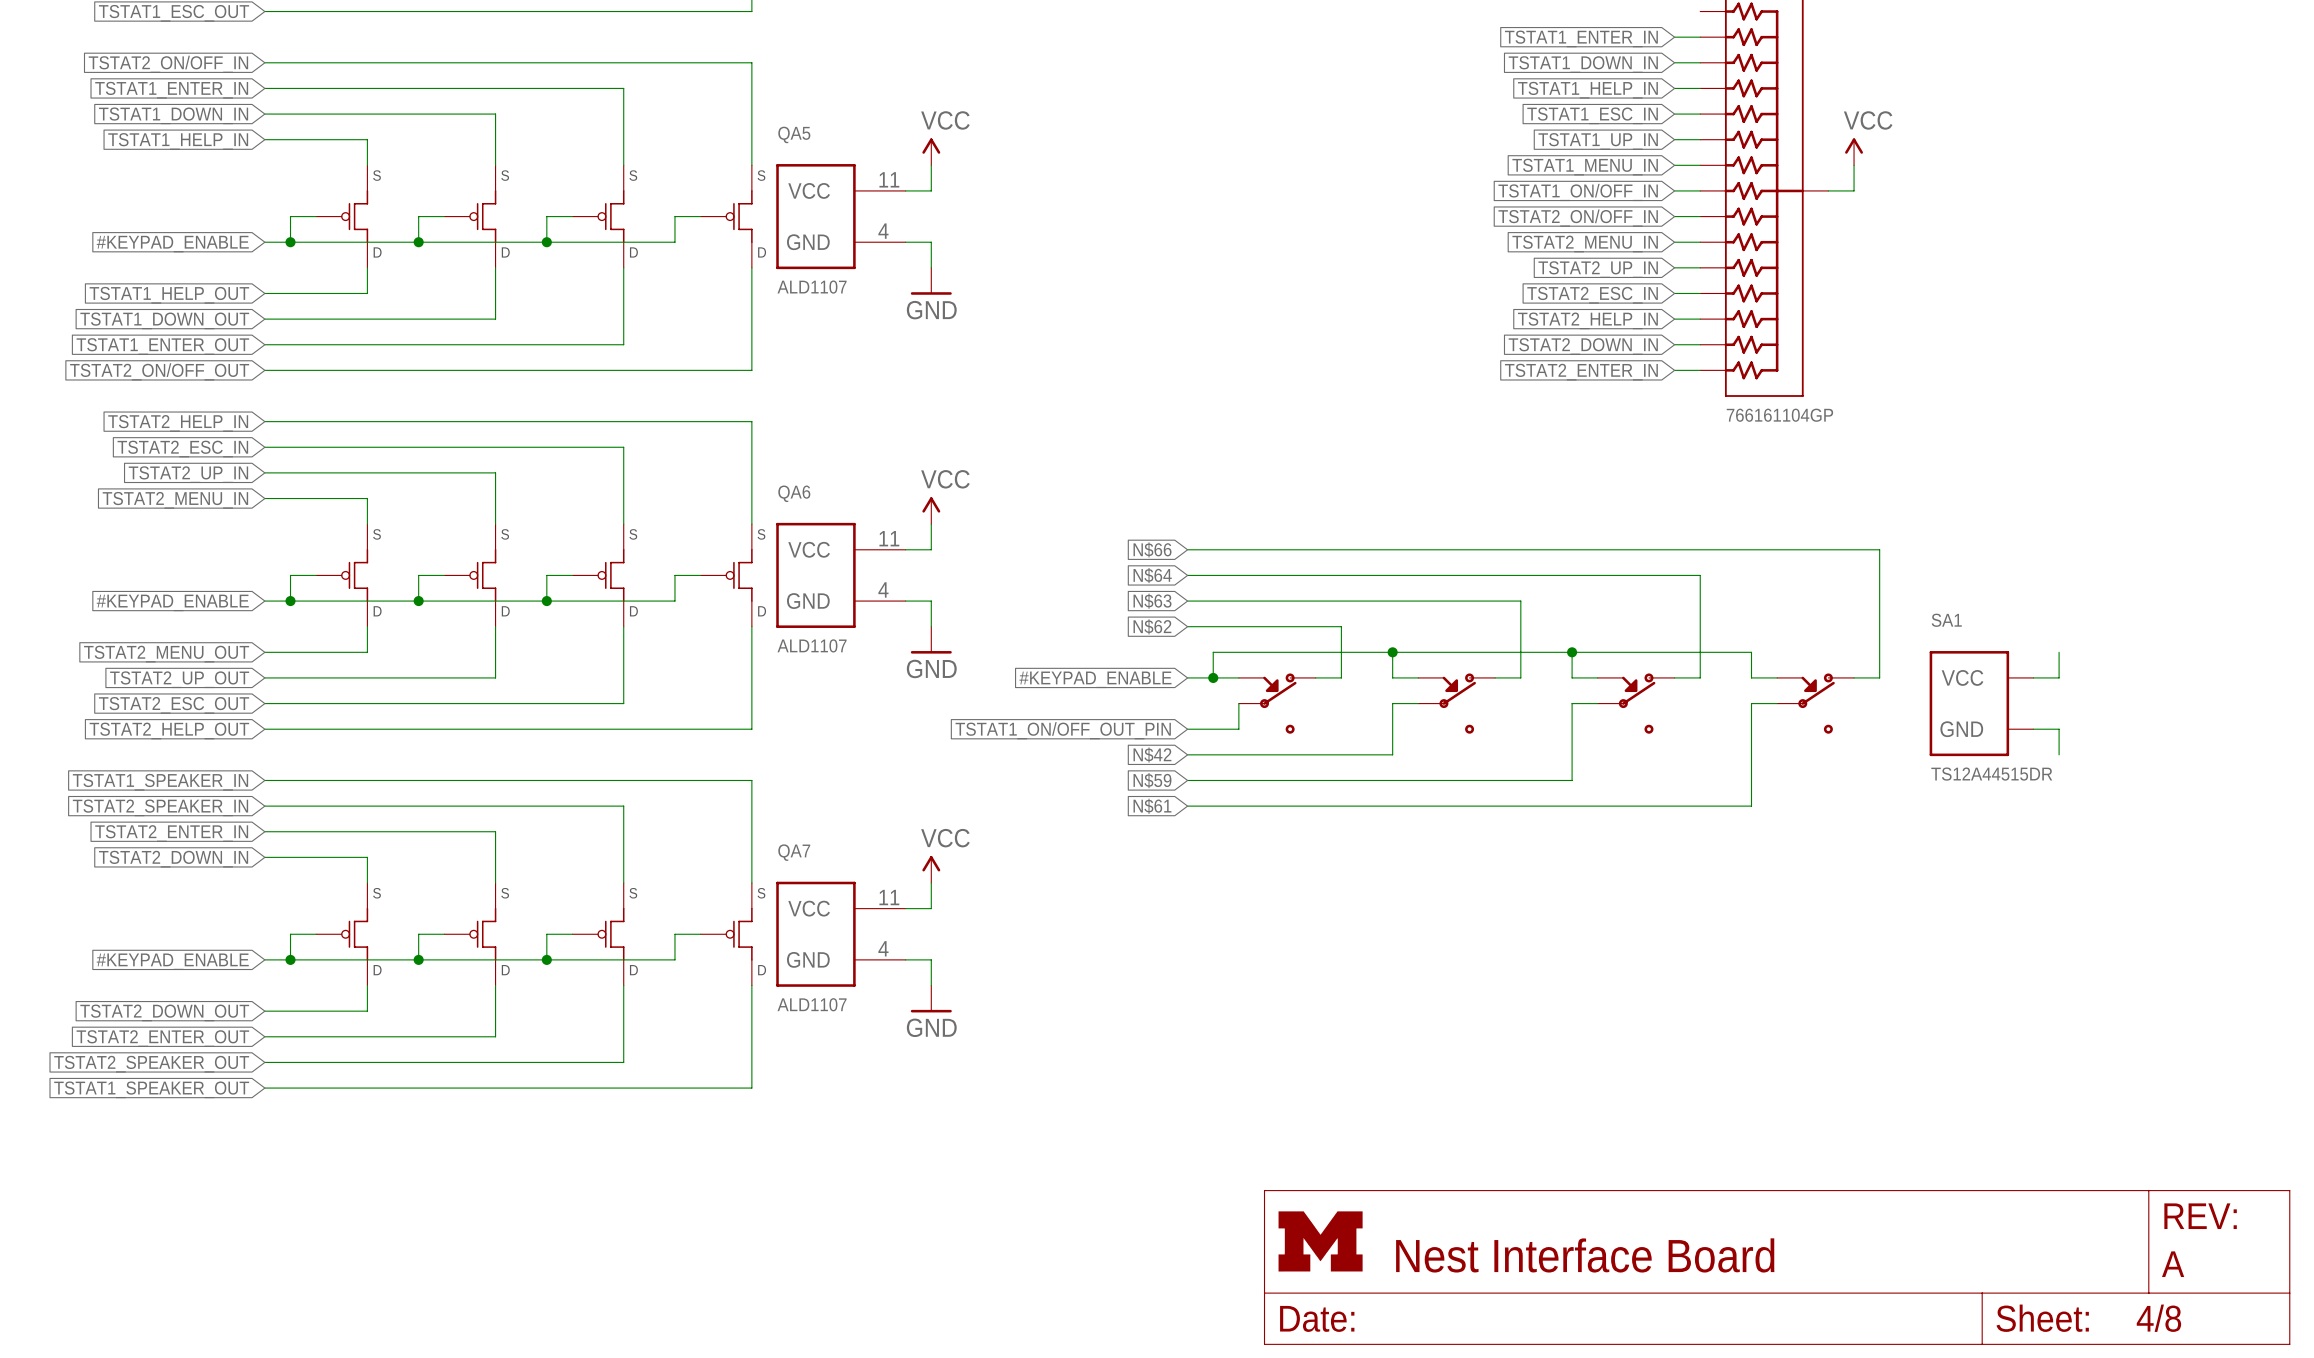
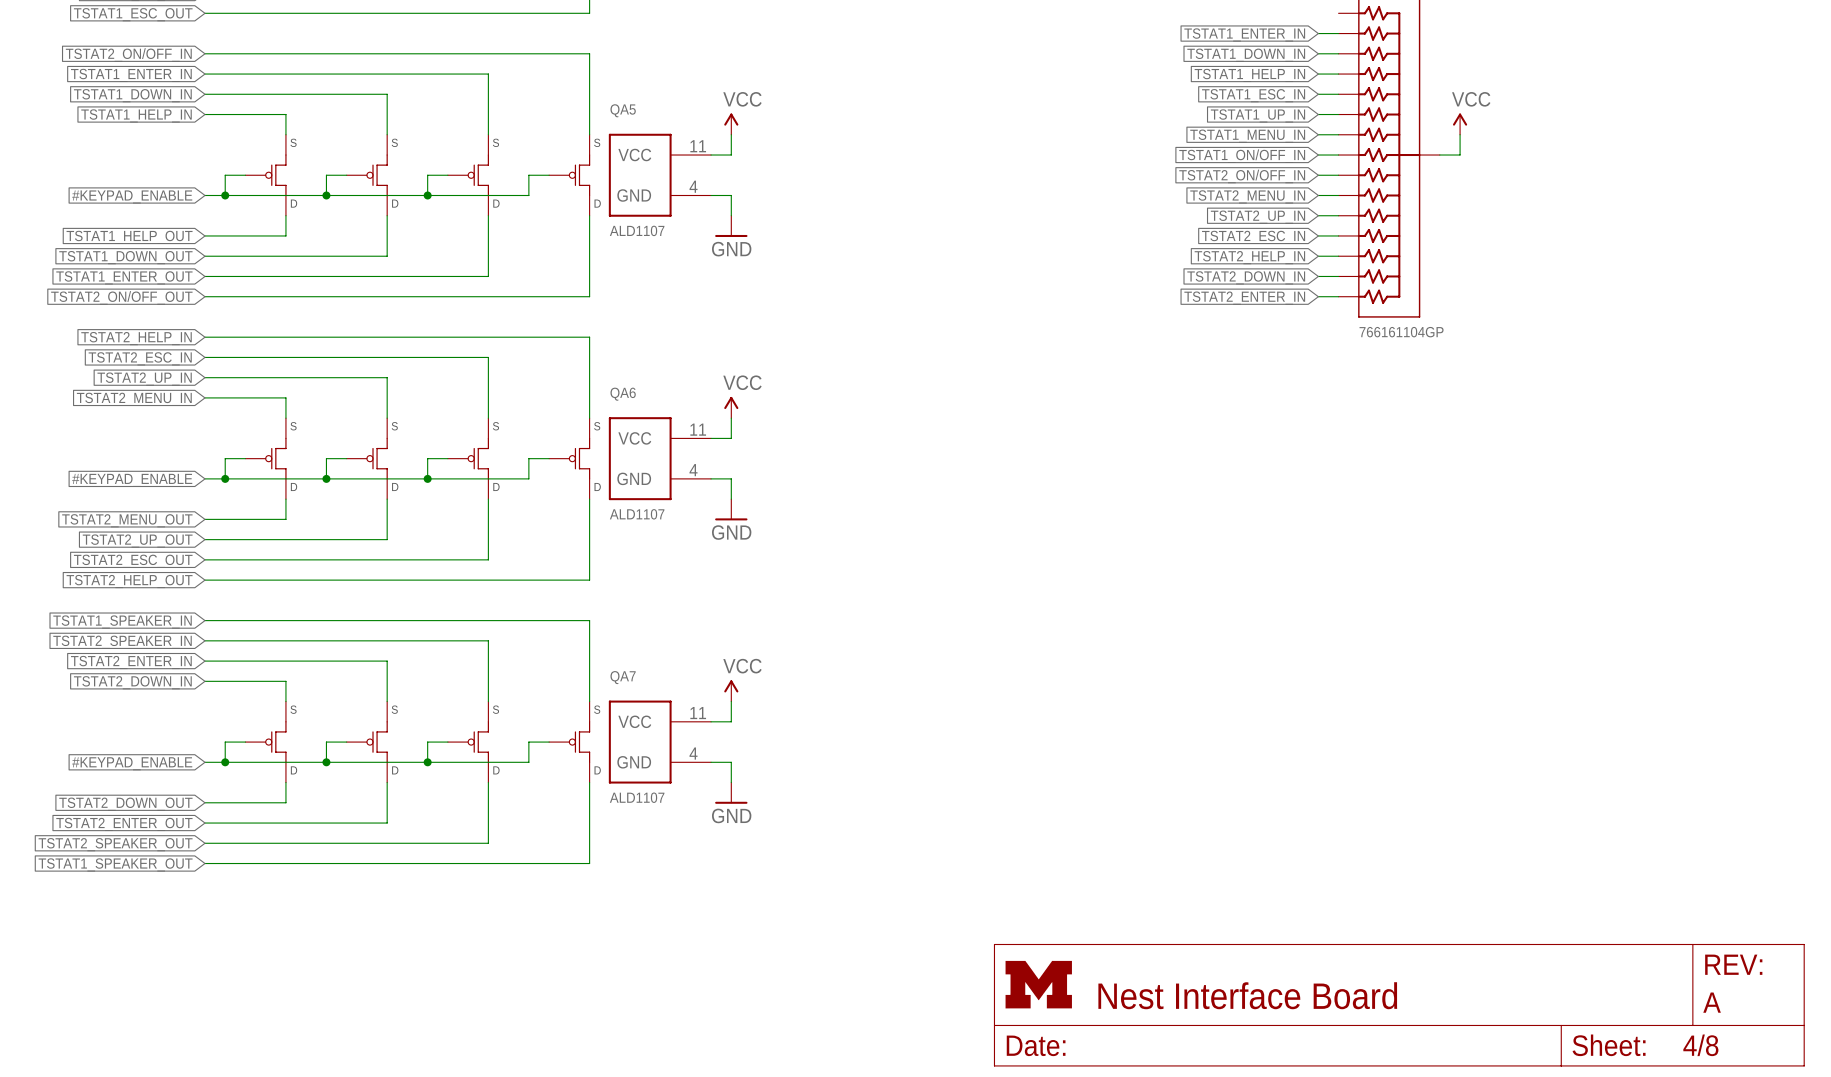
global label: N$66 (1152, 549) -> none
wire: (1187, 549) (1879, 549) (1879, 677) (1854, 677) -> none
global label: N$64 (1152, 575) -> none
wire: (1187, 575) (1700, 575) (1700, 677) (1674, 677) -> none
global label: N$63 (1152, 601) -> none
wire: (1187, 601) (1520, 601) (1520, 677) (1495, 677) -> none
global label: N$62 (1152, 626) -> none
wire: (1187, 626) (1341, 626) (1341, 677) (1315, 677) -> none
wire: (1392, 652) (1392, 677) (1418, 677) -> none
junction: (1392, 652) -> none
wire: (1572, 652) (1572, 677) (1597, 677) -> none
junction: (1572, 652) -> none
wire: (2059, 652) (2059, 677) (2033, 677) -> none
wire: (1187, 677) (1238, 677) -> none
wire: (1213, 677) (1213, 652) (1751, 652) (1751, 677) (1777, 677) -> none
junction: (1213, 677) -> none
global label: #KEYPAD_ENABLE (1095, 679) -> none
wire: (1238, 703) (1238, 729) (1187, 729) -> none
wire: (1418, 703) (1392, 703) (1392, 754) (1187, 754) -> none
wire: (1597, 703) (1572, 703) (1572, 780) (1187, 780) -> none
SA1: TS12A44515DR (1636, 703) -> none
wire: (1777, 703) (1751, 703) (1751, 806) (1187, 806) -> none
wire: (2033, 729) (2059, 729) (2059, 754) -> none
global label: TSTAT1_ON/OFF_OUT_PIN (1063, 730) -> none
global label: N$42 (1152, 755) -> none
global label: N$59 (1152, 780) -> none
global label: N$61 (1152, 806) -> none

